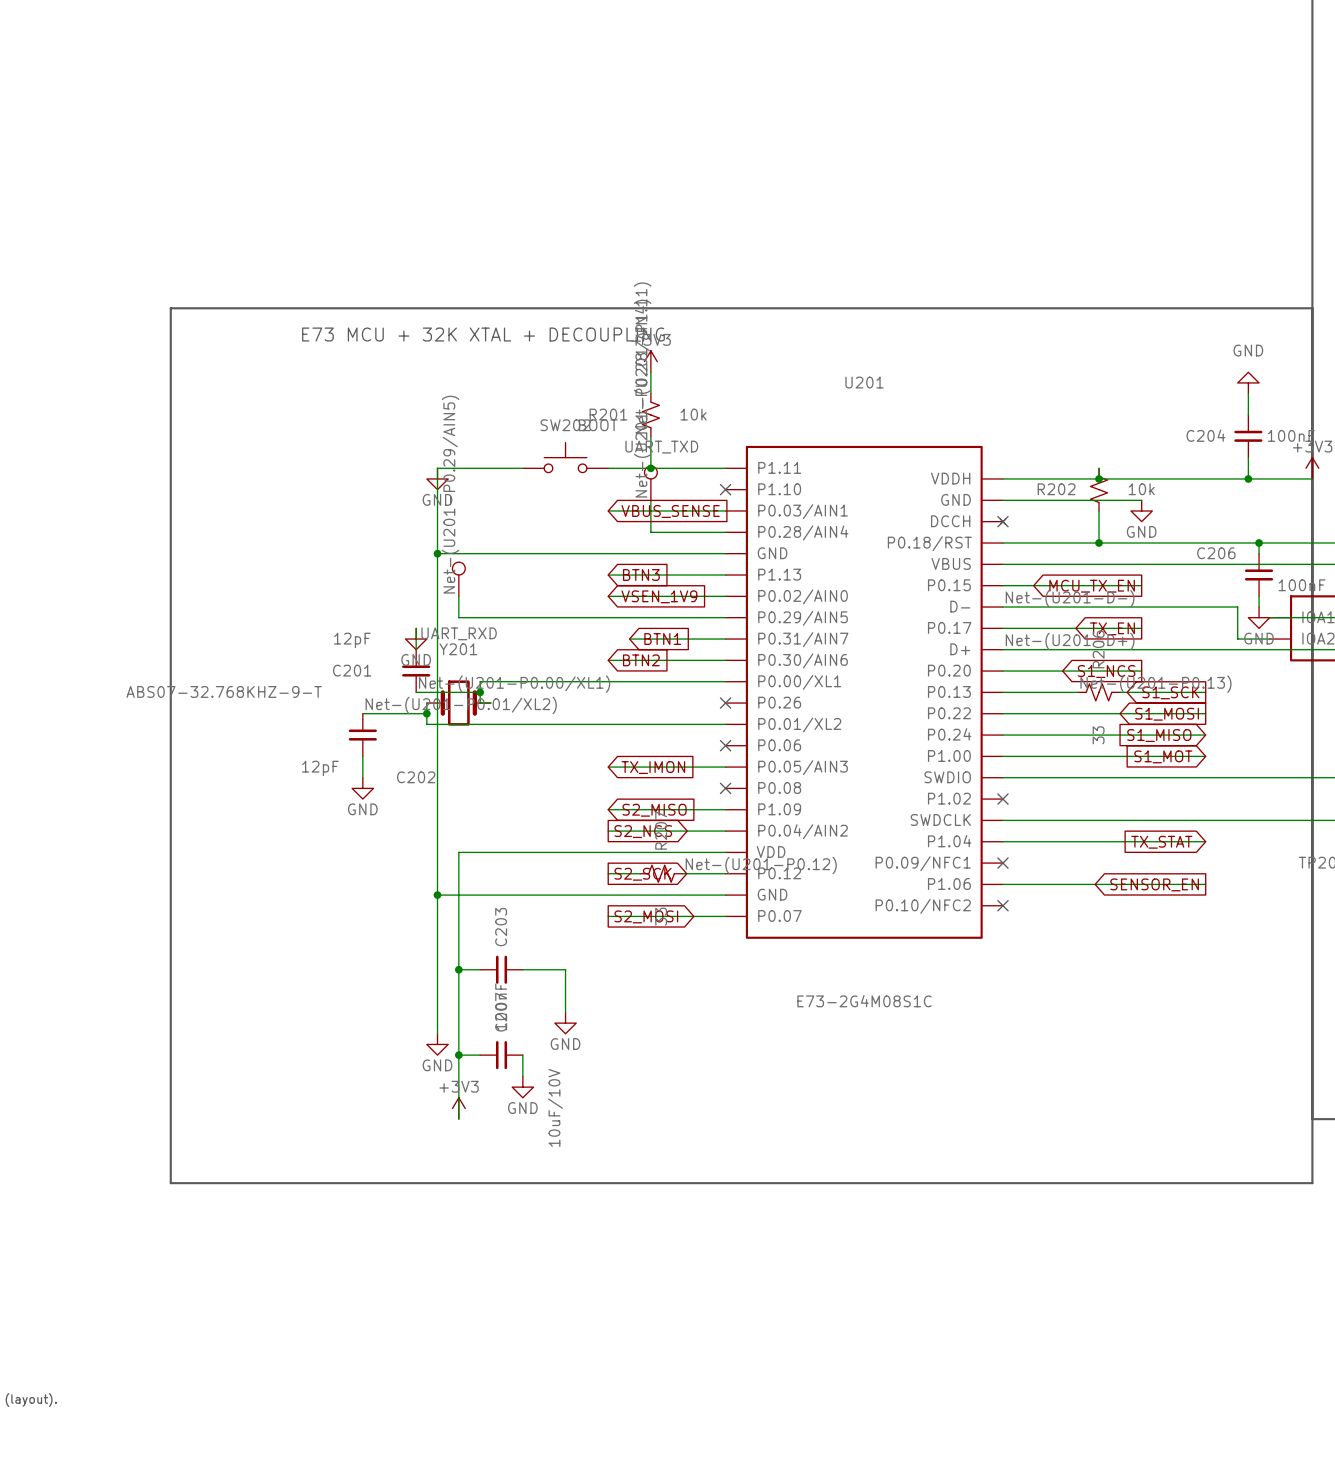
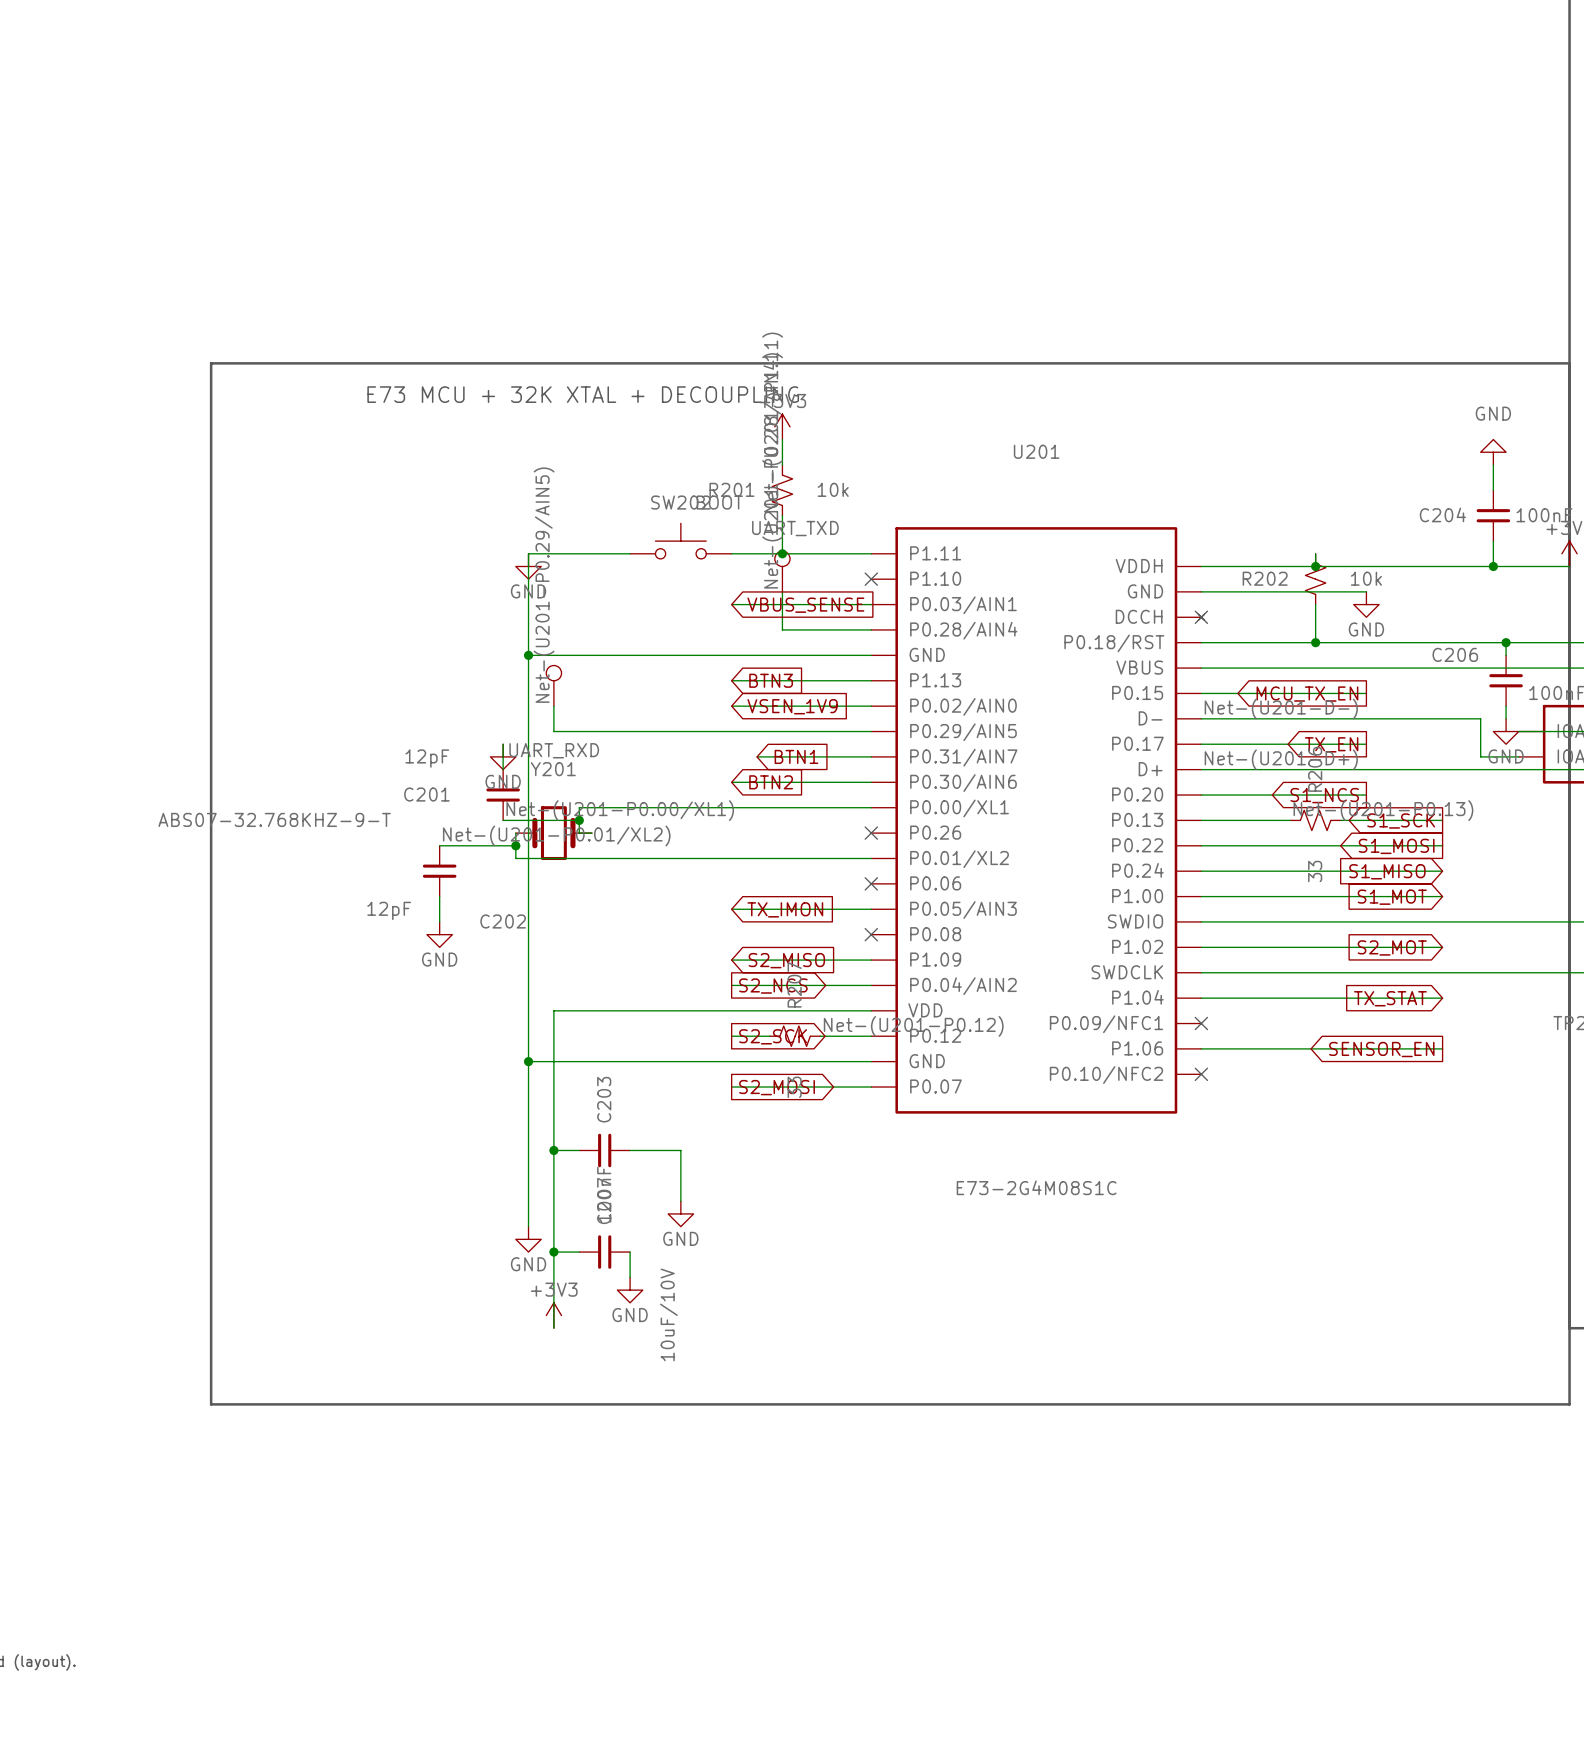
wire: none -> (1201, 947) (1442, 947)
no-connect mark: (1002, 799) -> none
global label: none -> S2_MOT (1392, 947)

